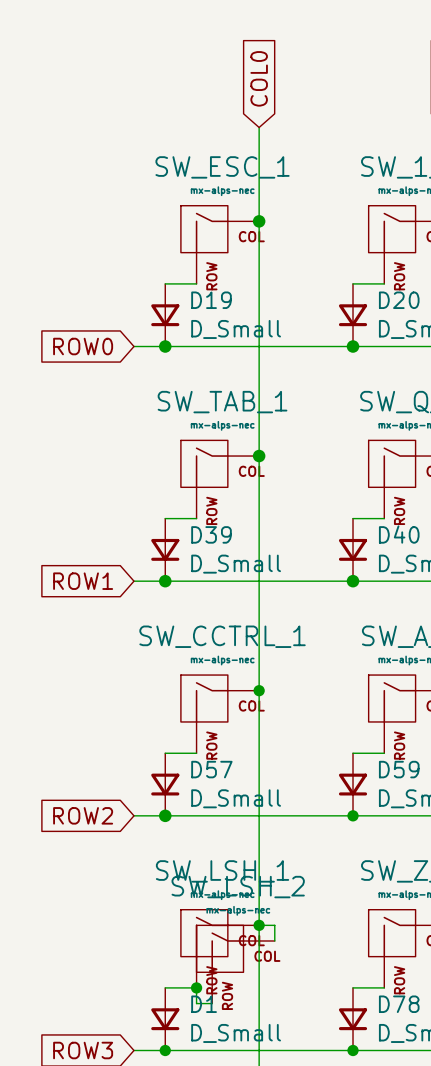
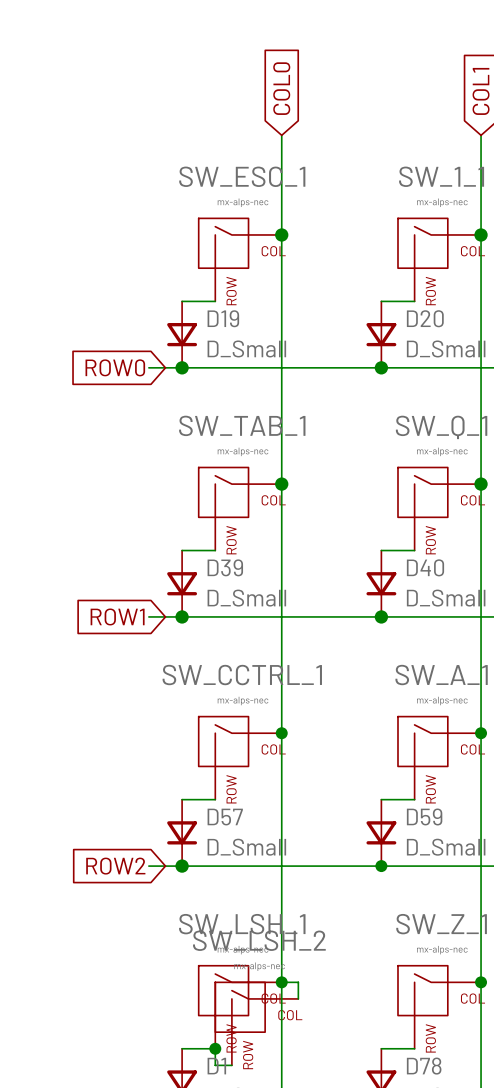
global label position: ROW0 (83, 346) -> ROW0 (115, 367)
global label position: ROW1 (83, 581) -> ROW1 (117, 616)
global label position: ROW2 (83, 815) -> ROW2 (115, 866)

